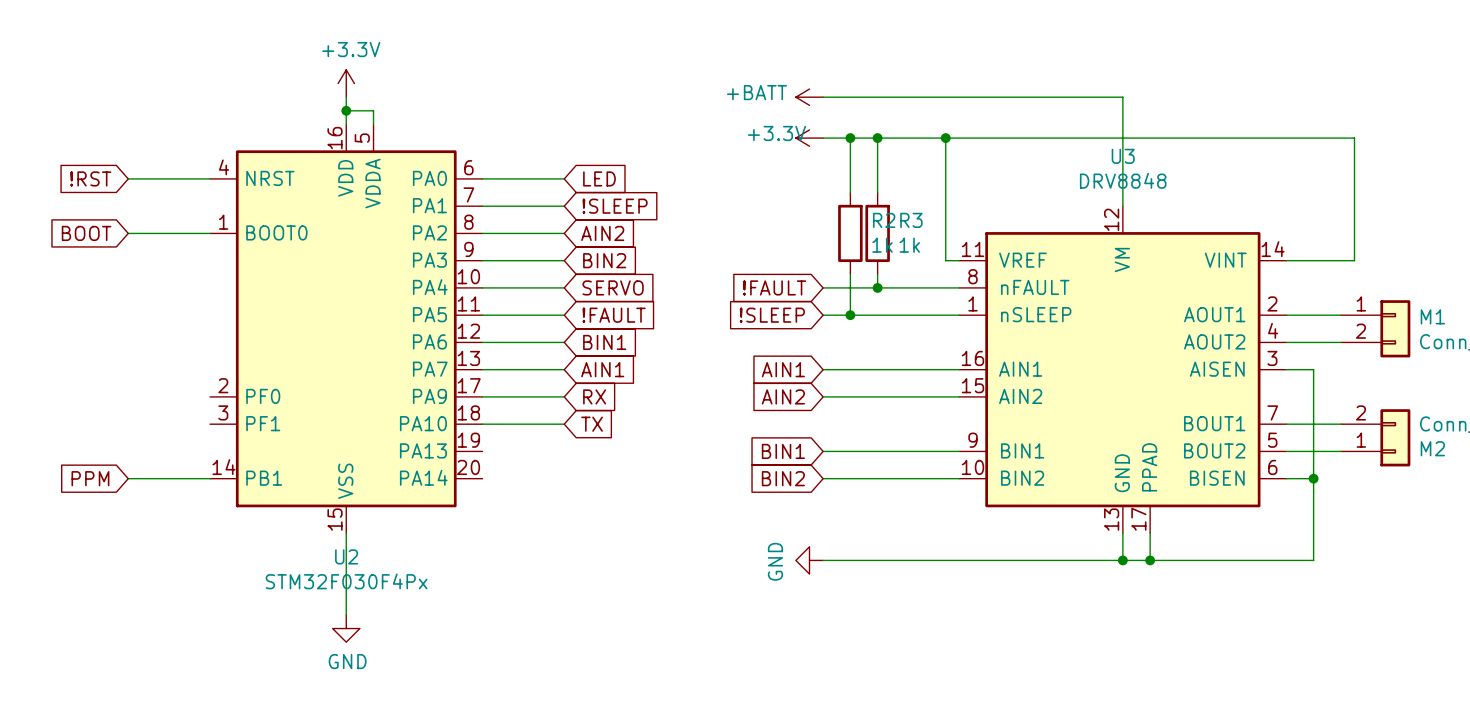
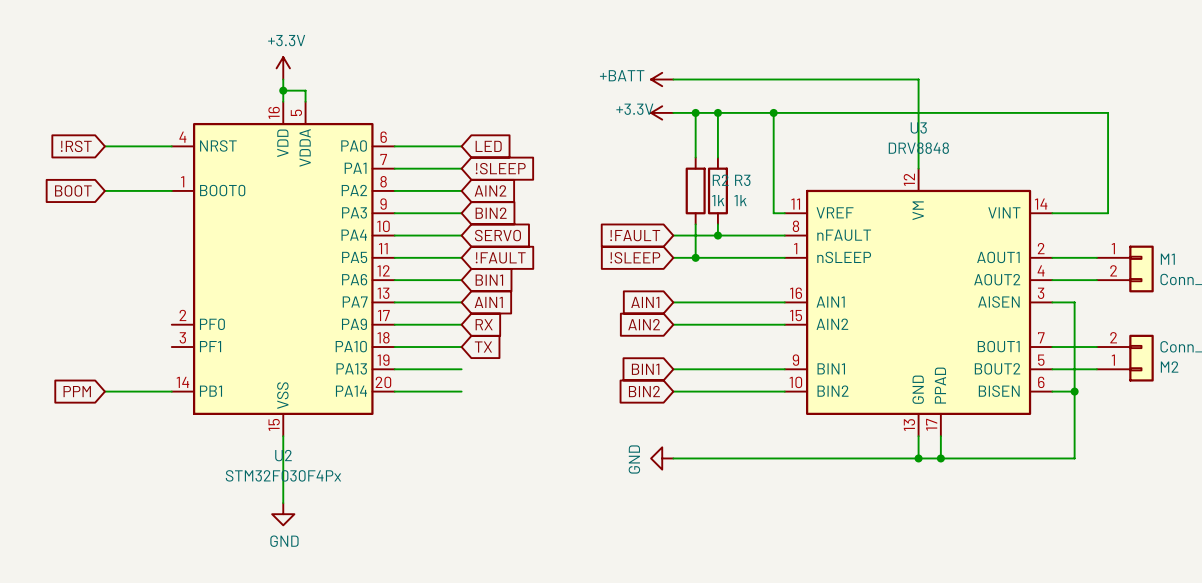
wire: none -> (394, 369) (461, 369)
wire: none -> (394, 391) (461, 391)

